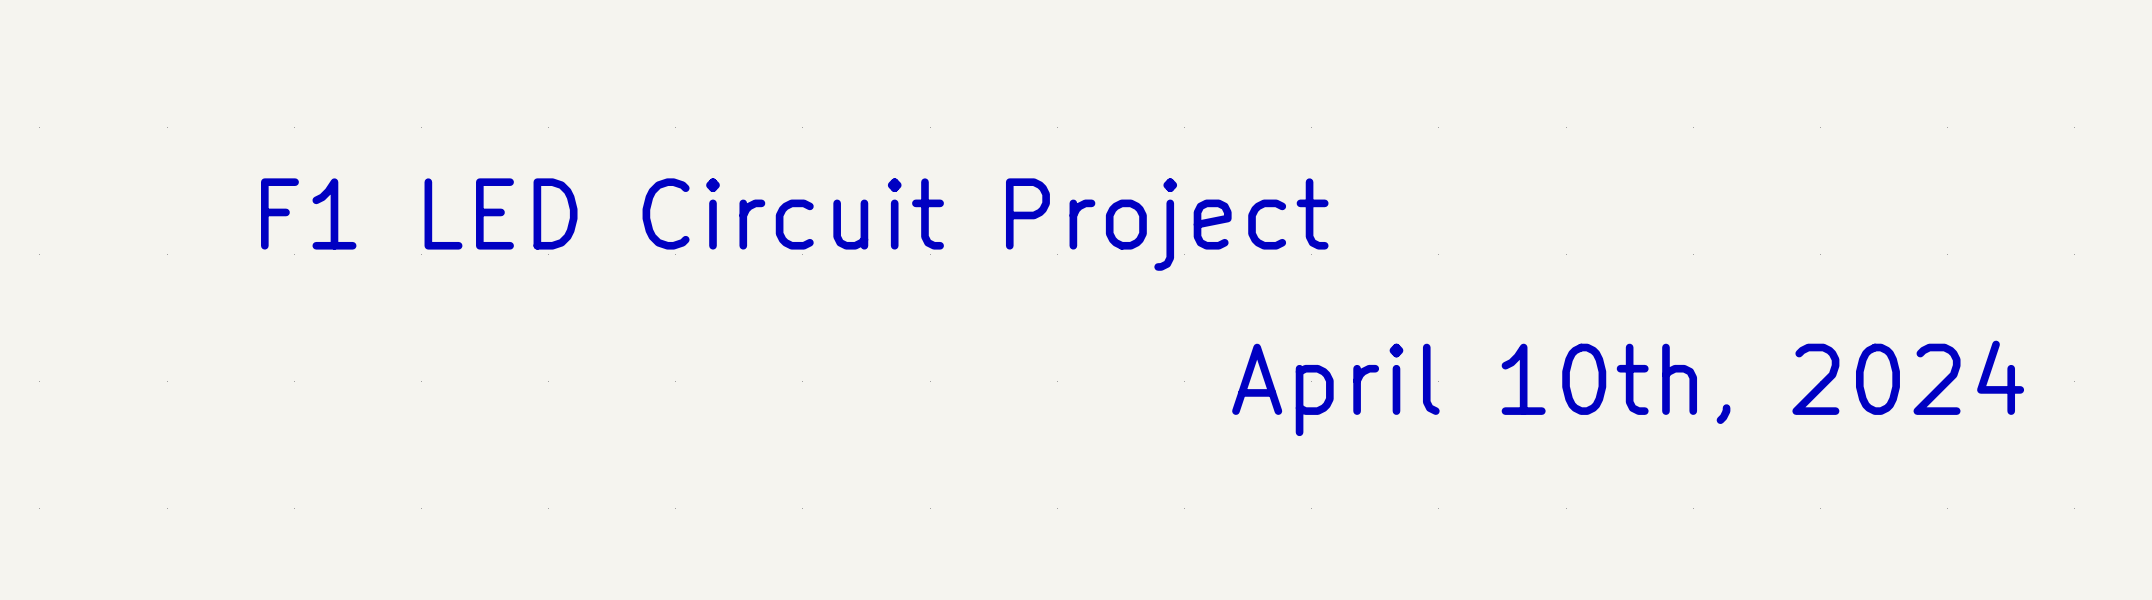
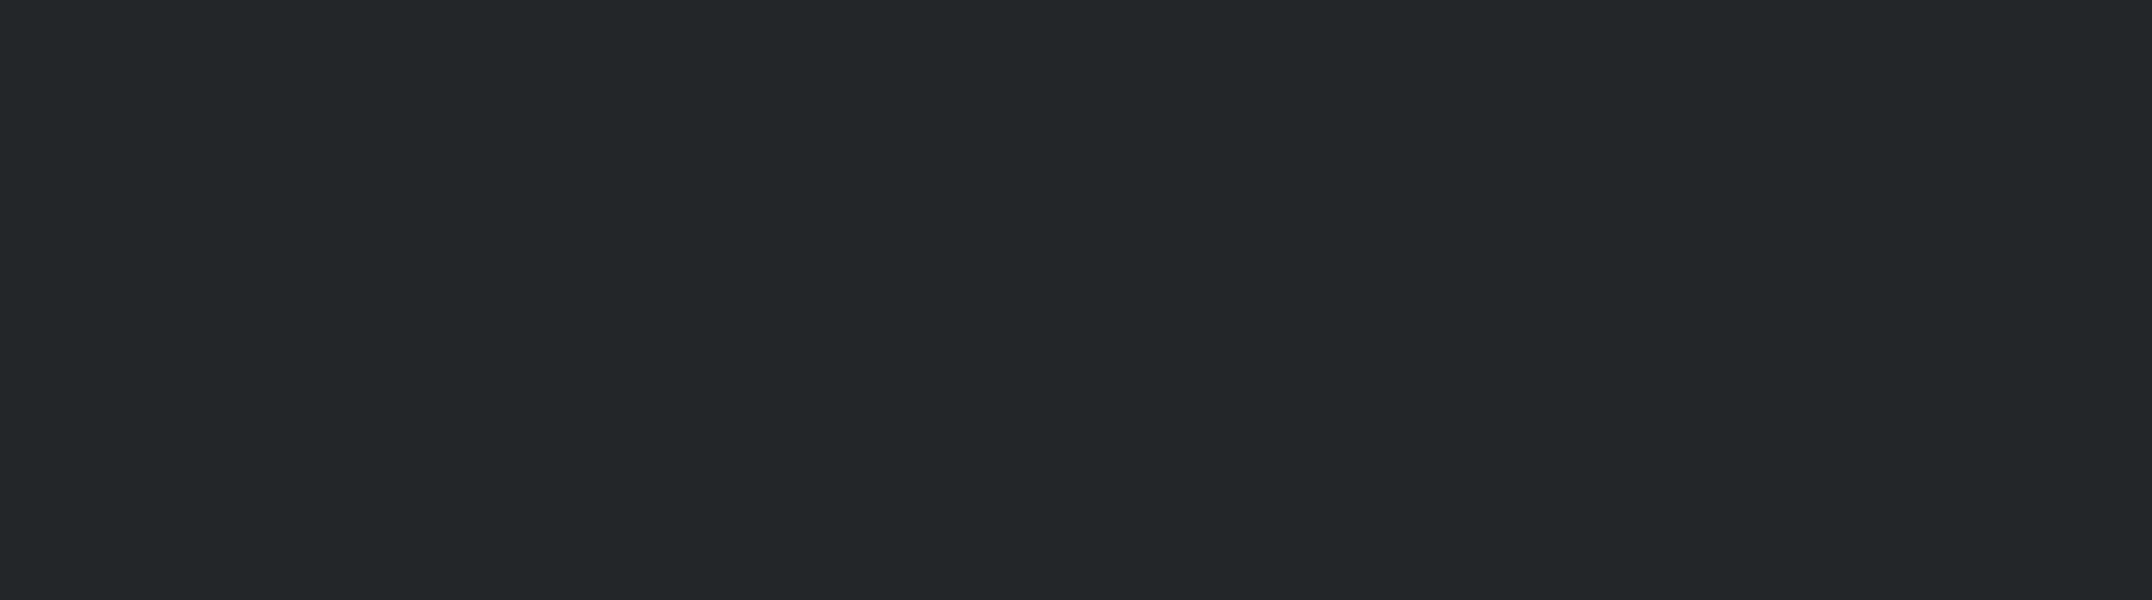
text: F1 LED Circuit Project (794, 224) -> none
text: April 10th, 2024 (1628, 388) -> none

